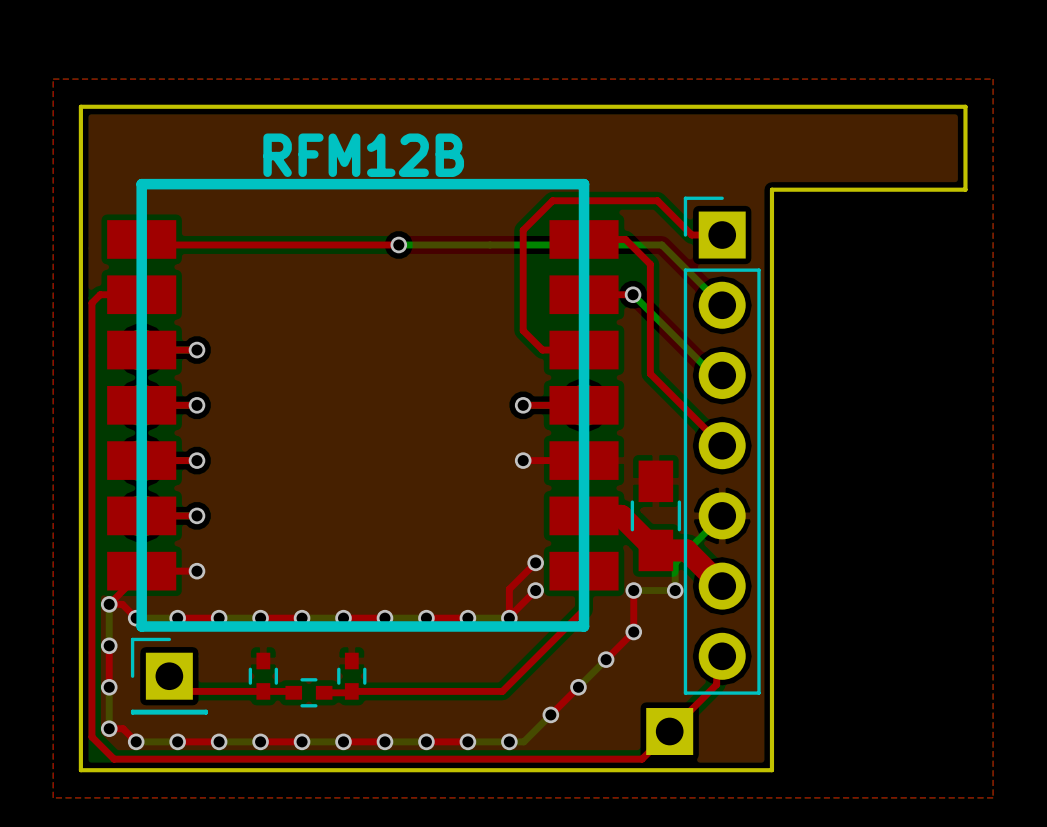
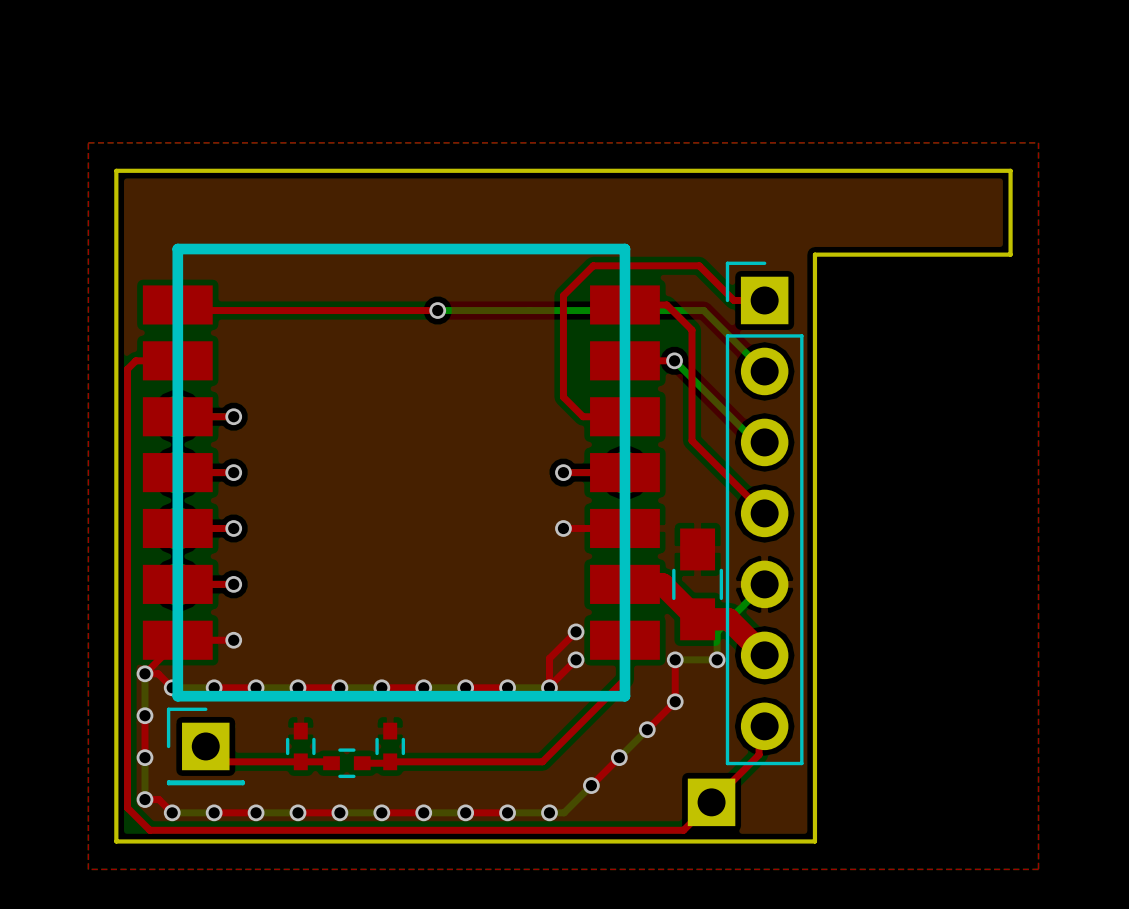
part value: RFM12B (363, 155) -> none

